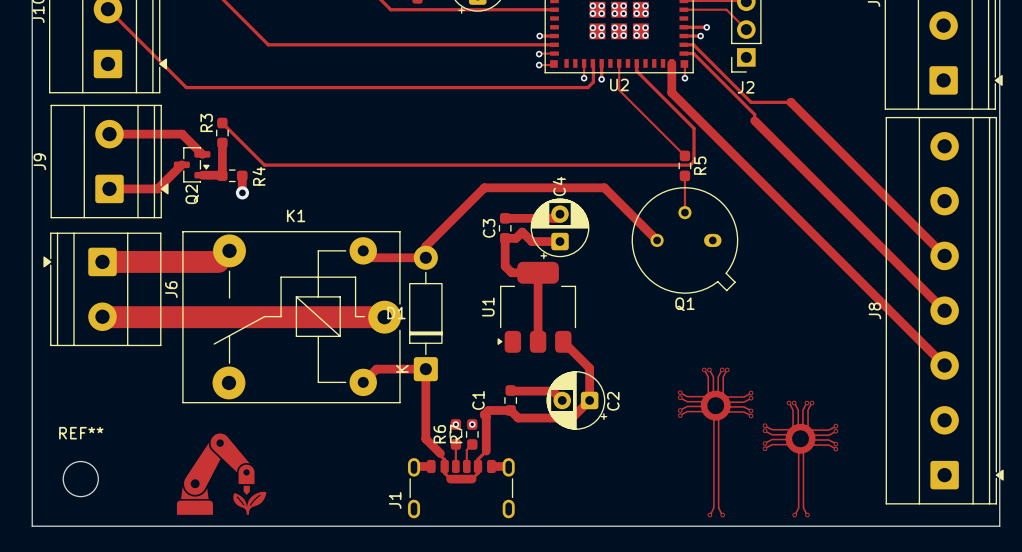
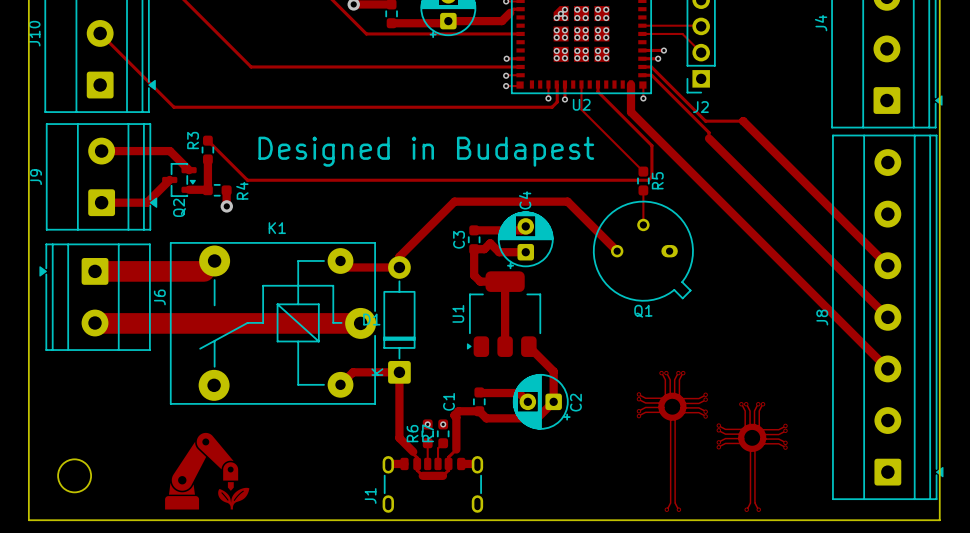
text: none -> Designed in Budapest (426, 151)
REF** name: REF** (81, 433) -> none

